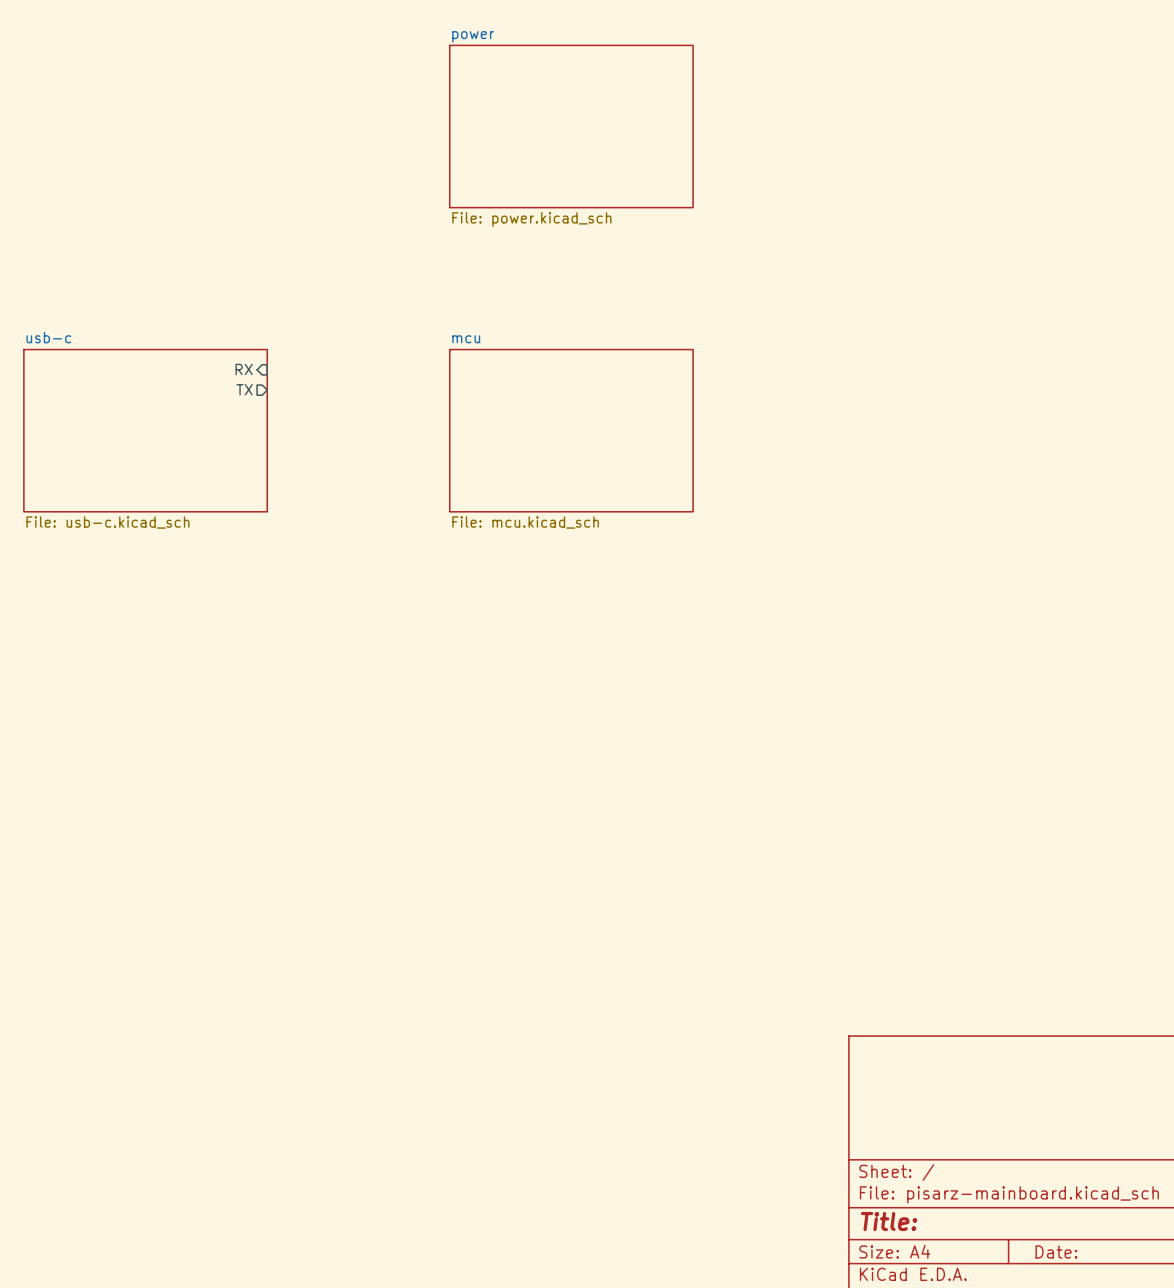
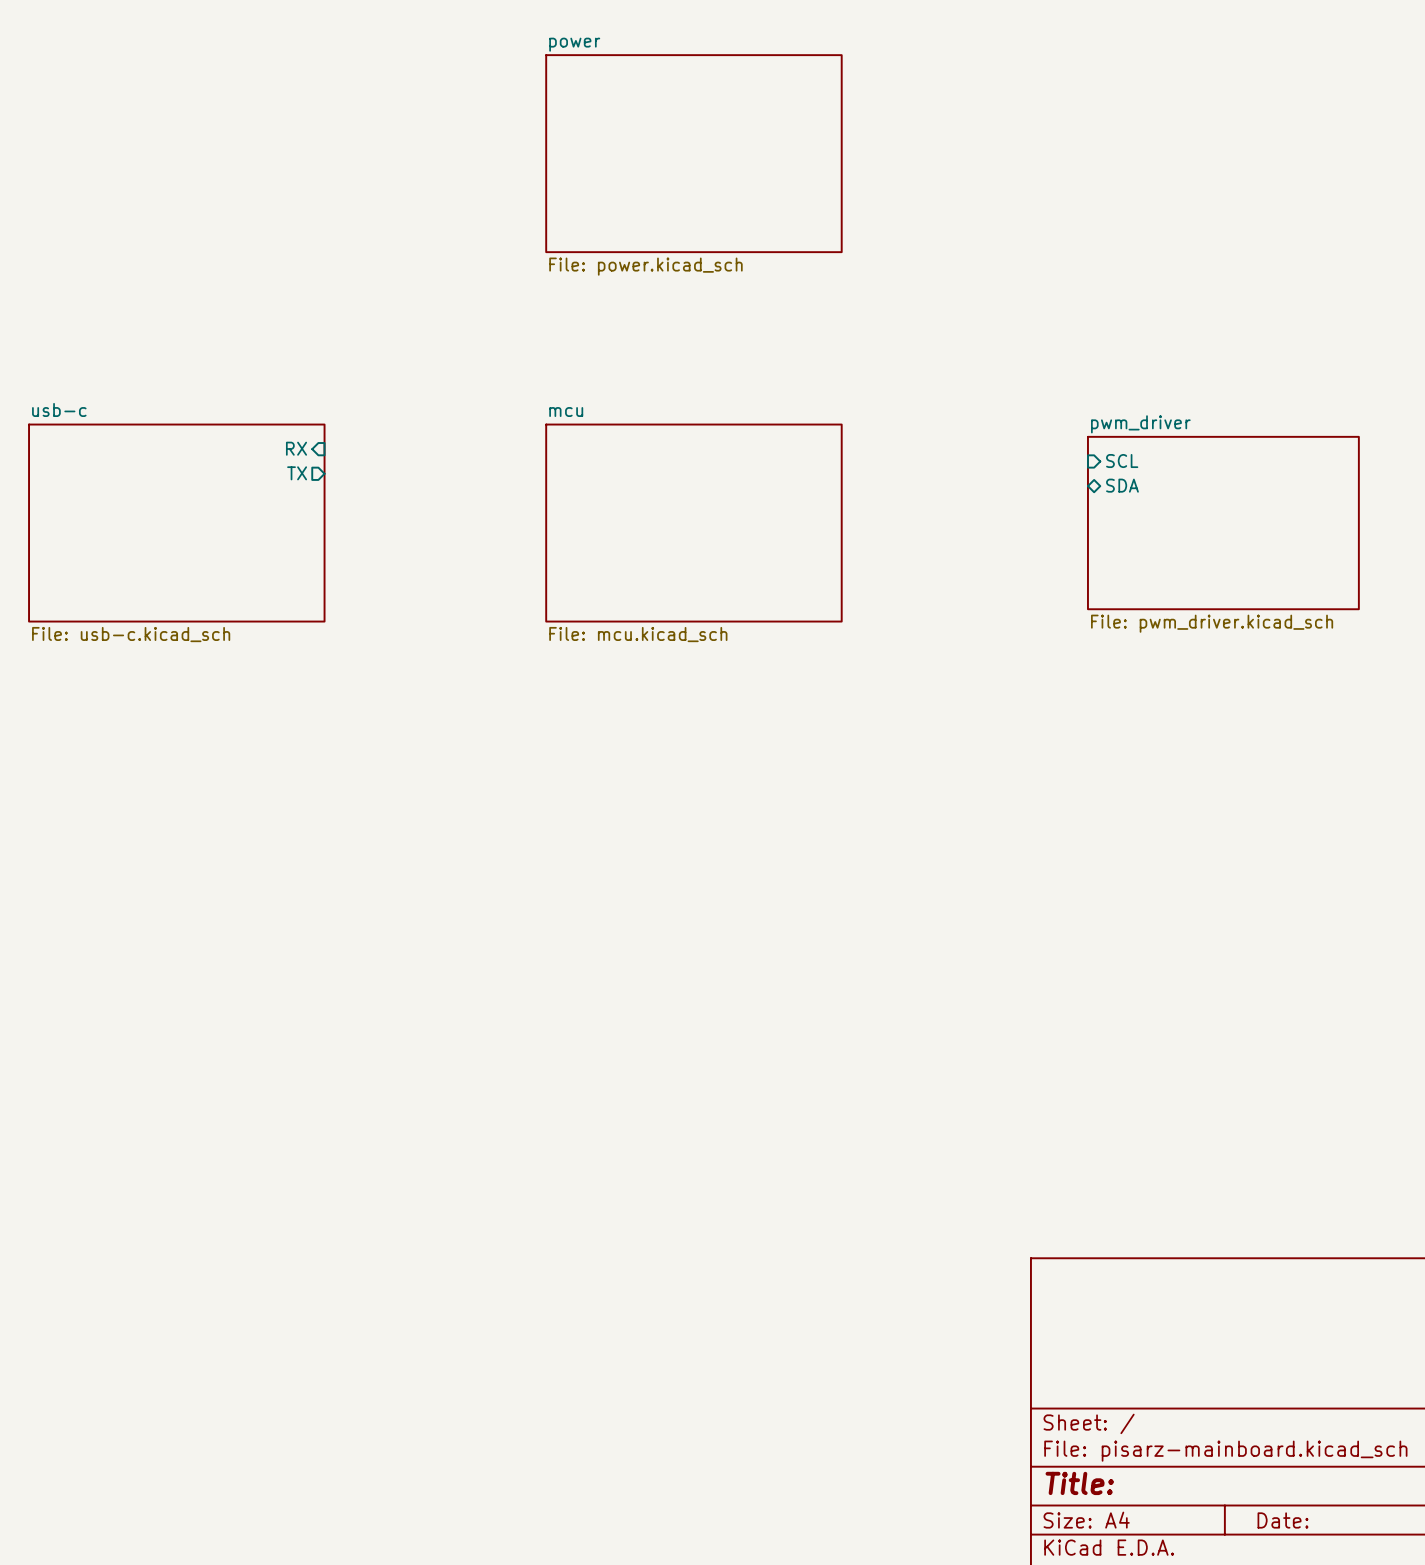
sheet pin: none -> SCL (1122, 461)
sheet pin: none -> SDA (1122, 485)
sheet pwm_driver: none -> File: pwm_driver.kicad_sch (1223, 523)

